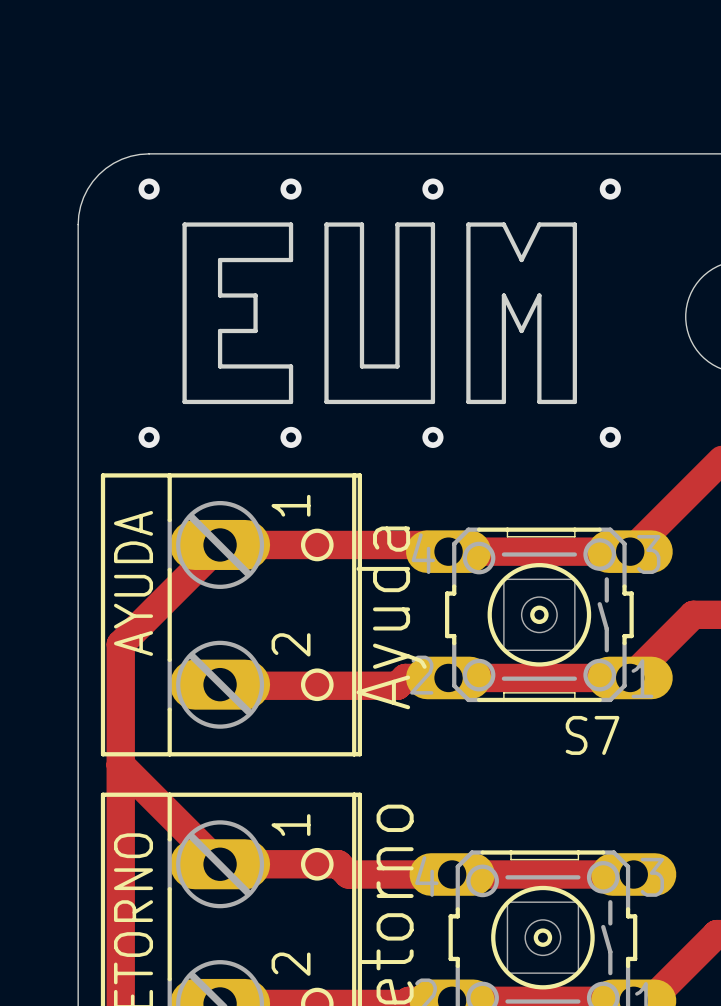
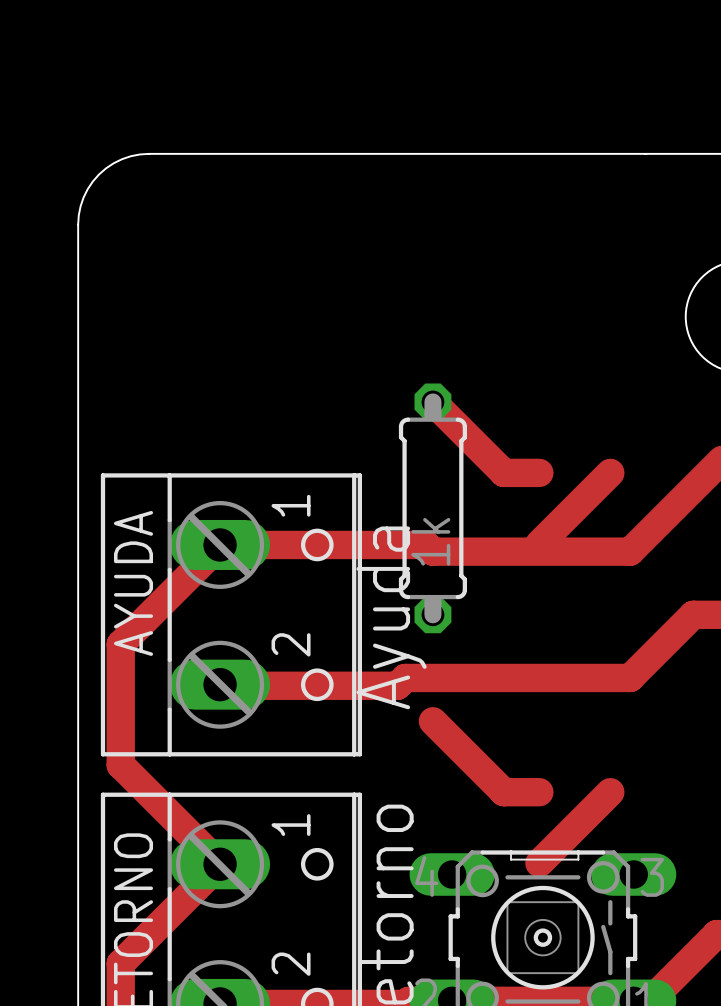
via: (149, 189) -> none
via: (291, 189) -> none
via: (432, 189) -> none
via: (610, 189) -> none
board edge: (184, 224) (291, 224) (291, 260) (220, 260) (220, 295) (255, 295) (255, 330) (220, 330) (220, 366) (291, 366) (291, 401) (184, 401) (184, 224) -> none
board edge: (326, 224) (361, 224) (361, 366) (397, 366) (397, 224) (432, 224) (432, 401) (326, 401) (326, 224) -> none
board edge: (468, 224) (503, 224) (521, 260) (539, 224) (574, 224) (574, 401) (539, 401) (539, 295) (521, 330) (503, 295) (503, 401) (468, 401) (468, 224) -> none
track: none -> (432, 401) (503, 472) (539, 472)
via: (149, 437) -> none
via: (291, 437) -> none
via: (432, 437) -> none
via: (610, 437) -> none
track: none -> (610, 472) (539, 543)
part: none -> 1k (432, 508)
S7: (539, 614) -> none
track: none -> (432, 721) (503, 792) (539, 792)
track: (120, 764) (120, 963) -> (220, 864) (120, 963)
track: none -> (610, 792) (539, 863)
track: (220, 864) (338, 864) (348, 874) (633, 874) -> none

